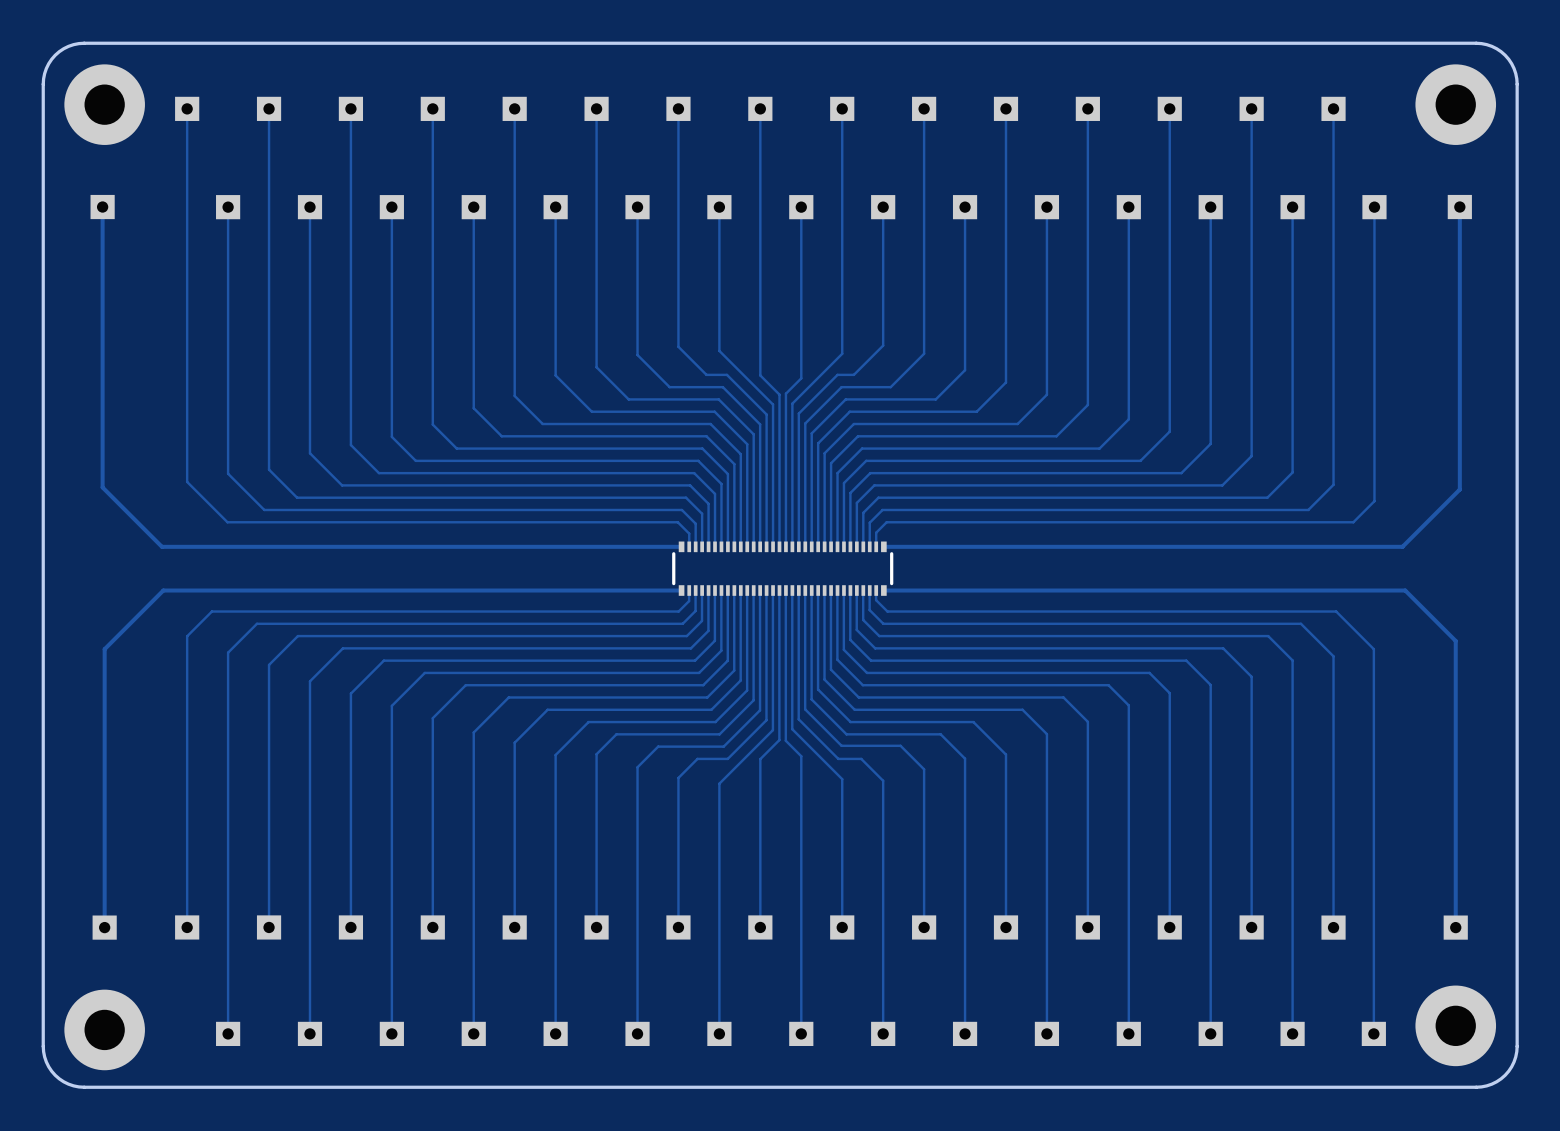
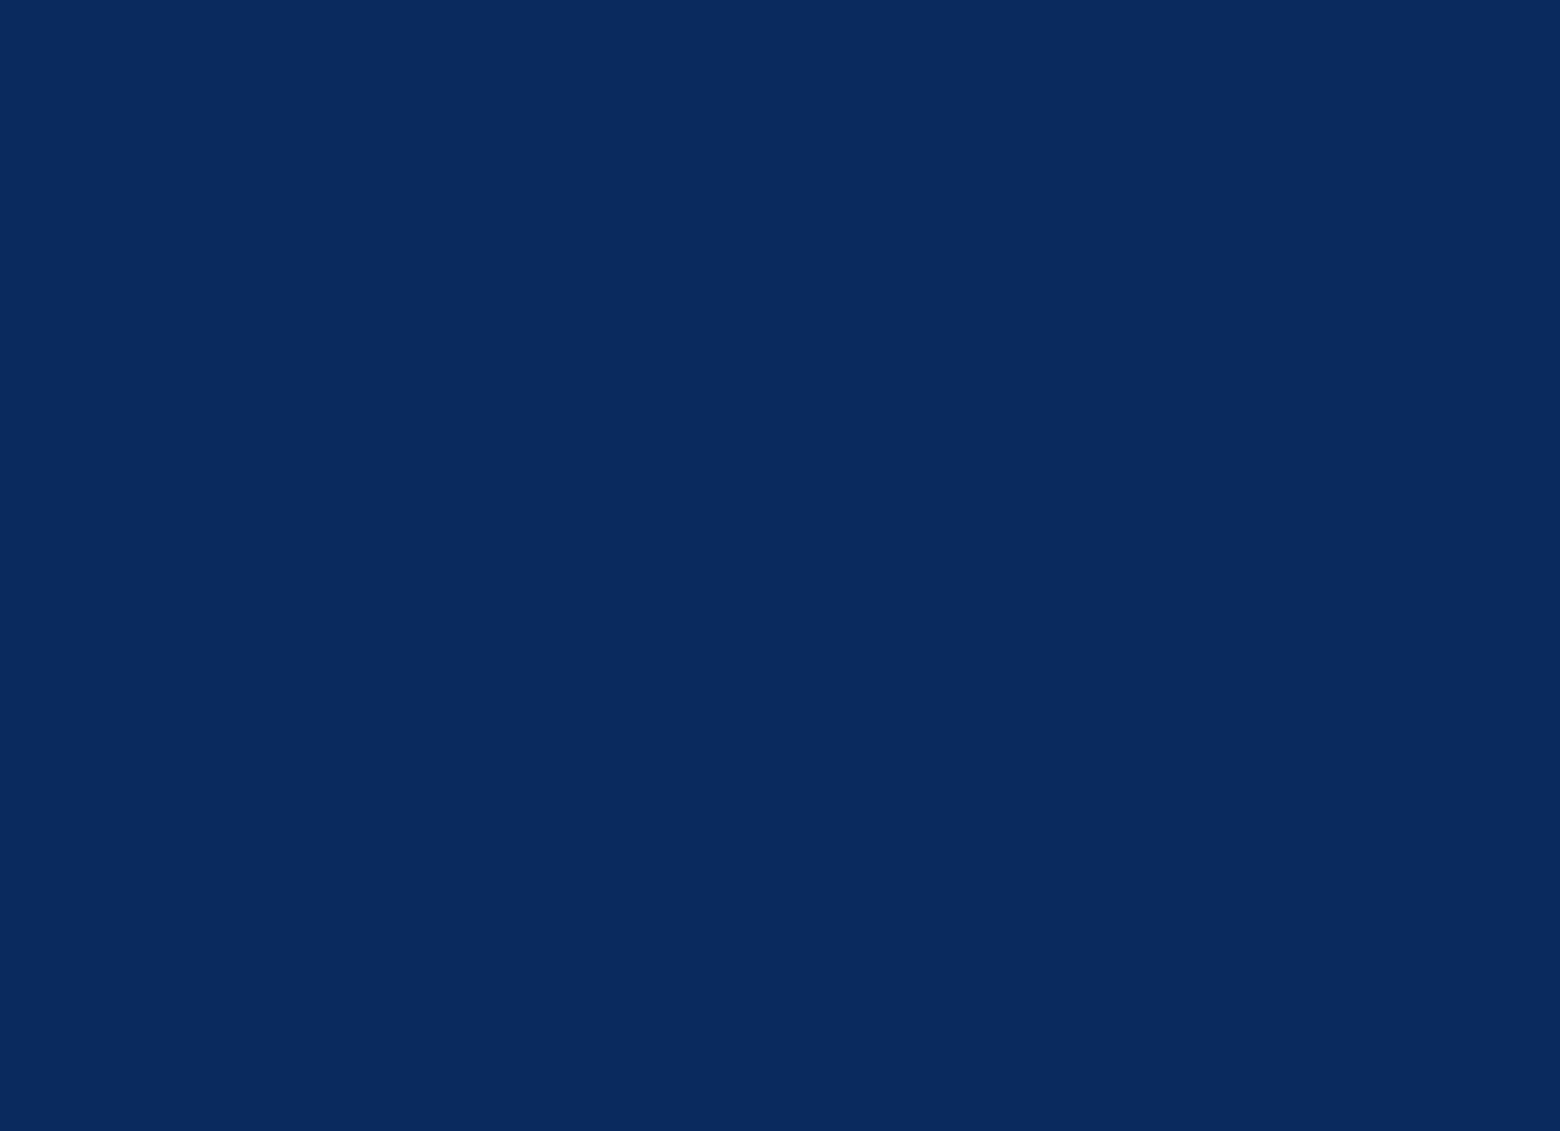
board edge: (1476, 43) (84, 43) (68, 46) (59, 51) (48, 63) (43, 84) (43, 1046) (44, 1056) (51, 1071) (63, 1081) (84, 1087) (1476, 1087) (1486, 1085) (1501, 1078) (1511, 1066) (1517, 1046) (1517, 84) (1514, 68) (1505, 55) (1491, 46) (1476, 43) -> none
part: (104, 104) -> none
part: (1455, 104) -> none
track: (187, 108) (187, 481) (227, 522) (677, 522) (689, 533) (689, 546) -> none
part: (187, 108) -> none
track: (269, 108) (269, 469) (297, 497) (686, 497) (702, 513) (702, 546) -> none
part: (269, 108) -> none
track: (350, 108) (350, 445) (378, 473) (694, 473) (715, 493) (715, 546) -> none
part: (350, 108) -> none
track: (432, 108) (432, 424) (456, 448) (702, 448) (727, 474) (727, 546) -> none
part: (432, 108) -> none
track: (514, 108) (514, 395) (542, 424) (710, 424) (740, 454) (740, 546) -> none
part: (514, 108) -> none
track: (596, 108) (596, 367) (628, 399) (718, 399) (753, 434) (753, 546) -> none
part: (596, 108) -> none
track: (678, 108) (678, 346) (706, 374) (726, 374) (766, 414) (766, 546) -> none
part: (678, 108) -> none
track: (760, 108) (760, 375) (779, 394) (779, 546) -> none
part: (760, 108) -> none
track: (842, 108) (842, 353) (792, 403) (792, 546) -> none
part: (842, 108) -> none
track: (924, 108) (924, 353) (890, 387) (841, 387) (805, 423) (805, 546) -> none
part: (924, 108) -> none
track: (1005, 108) (1005, 382) (976, 411) (849, 411) (818, 443) (818, 546) -> none
part: (1005, 108) -> none
track: (1087, 108) (1087, 404) (1056, 436) (857, 436) (831, 463) (831, 546) -> none
part: (1087, 108) -> none
track: (1169, 108) (1169, 431) (1140, 460) (866, 460) (843, 483) (843, 546) -> none
part: (1169, 108) -> none
track: (1251, 108) (1251, 456) (1222, 485) (874, 485) (856, 502) (856, 546) -> none
part: (1251, 108) -> none
track: (1333, 108) (1333, 484) (1308, 509) (882, 509) (869, 522) (869, 546) -> none
part: (1333, 108) -> none
track: (102, 207) (102, 487) (161, 546) (681, 546) -> none
part: (102, 207) -> none
track: (228, 207) (228, 473) (264, 509) (681, 509) (695, 523) (695, 546) -> none
part: (228, 207) -> none
track: (309, 207) (309, 453) (342, 485) (690, 485) (708, 503) (708, 546) -> none
part: (309, 207) -> none
track: (391, 207) (391, 436) (415, 460) (698, 460) (721, 484) (721, 546) -> none
part: (391, 207) -> none
track: (473, 207) (473, 408) (501, 436) (706, 436) (734, 464) (734, 546) -> none
part: (473, 207) -> none
track: (555, 207) (555, 375) (591, 411) (714, 411) (747, 444) (747, 546) -> none
part: (555, 207) -> none
track: (637, 207) (637, 355) (669, 387) (722, 387) (760, 424) (760, 546) -> none
part: (637, 207) -> none
track: (719, 207) (719, 350) (773, 404) (773, 546) -> none
part: (719, 207) -> none
track: (801, 207) (801, 378) (785, 393) (785, 546) -> none
part: (801, 207) -> none
track: (883, 207) (883, 345) (853, 374) (837, 374) (798, 413) (798, 546) -> none
part: (883, 207) -> none
track: (965, 207) (965, 370) (935, 399) (845, 399) (811, 433) (811, 546) -> none
part: (965, 207) -> none
track: (1046, 207) (1046, 394) (1017, 424) (853, 424) (824, 453) (824, 546) -> none
part: (1046, 207) -> none
track: (1128, 207) (1128, 419) (1099, 448) (862, 448) (837, 473) (837, 546) -> none
part: (1128, 207) -> none
track: (1210, 207) (1210, 443) (1181, 473) (870, 473) (850, 493) (850, 546) -> none
part: (1210, 207) -> none
track: (1292, 207) (1292, 472) (1267, 497) (878, 497) (863, 512) (863, 546) -> none
part: (1292, 207) -> none
track: (1374, 207) (1374, 501) (1353, 522) (886, 522) (876, 532) (876, 546) -> none
part: (1374, 207) -> none
track: (1459, 207) (1459, 489) (1402, 546) (883, 546) -> none
part: (1459, 207) -> none
part: (782, 568) -> none
track: (689, 586) (689, 601) (678, 611) (211, 611) (187, 636) (187, 927) -> none
track: (695, 586) (695, 611) (682, 623) (256, 623) (228, 652) (228, 1033) -> none
track: (702, 586) (702, 620) (686, 636) (297, 636) (269, 664) (269, 927) -> none
track: (708, 586) (708, 630) (690, 648) (342, 648) (309, 681) (309, 1033) -> none
track: (714, 586) (714, 640) (695, 660) (383, 660) (350, 693) (350, 927) -> none
track: (721, 586) (721, 650) (699, 672) (424, 672) (391, 705) (391, 1033) -> none
track: (727, 586) (727, 660) (703, 685) (465, 685) (432, 718) (432, 927) -> none
track: (734, 586) (734, 670) (707, 697) (508, 697) (473, 732) (473, 1033) -> none
track: (740, 586) (740, 680) (711, 709) (547, 709) (514, 742) (514, 927) -> none
track: (747, 586) (747, 690) (715, 722) (588, 722) (555, 755) (555, 1033) -> none
track: (753, 586) (753, 700) (719, 734) (616, 734) (596, 754) (596, 927) -> none
track: (760, 586) (760, 710) (723, 746) (658, 746) (637, 767) (637, 1033) -> none
track: (766, 586) (766, 720) (727, 758) (697, 758) (678, 777) (678, 927) -> none
track: (772, 586) (772, 730) (719, 783) (719, 1033) -> none
track: (779, 586) (779, 740) (760, 759) (760, 927) -> none
track: (785, 586) (785, 740) (801, 756) (801, 1033) -> none
track: (792, 586) (792, 729) (842, 779) (842, 927) -> none
track: (798, 586) (798, 719) (838, 758) (861, 758) (883, 780) (883, 1033) -> none
track: (805, 586) (805, 709) (841, 745) (900, 745) (924, 769) (924, 927) -> none
track: (811, 586) (811, 699) (846, 734) (940, 734) (965, 758) (965, 1033) -> none
track: (818, 586) (818, 689) (850, 722) (973, 722) (1005, 754) (1005, 927) -> none
track: (824, 586) (824, 679) (854, 709) (1022, 709) (1046, 734) (1046, 1033) -> none
track: (830, 586) (830, 669) (858, 697) (1063, 697) (1087, 721) (1087, 927) -> none
track: (837, 586) (837, 659) (862, 685) (1108, 685) (1128, 705) (1128, 1033) -> none
track: (843, 586) (843, 649) (867, 672) (1149, 672) (1169, 693) (1169, 927) -> none
track: (850, 586) (850, 639) (871, 660) (1186, 660) (1210, 685) (1210, 1033) -> none
track: (856, 586) (856, 629) (875, 648) (1223, 648) (1251, 676) (1251, 927) -> none
track: (863, 586) (863, 620) (879, 636) (1268, 636) (1292, 660) (1292, 1033) -> none
track: (869, 586) (869, 610) (883, 623) (1300, 623) (1333, 656) (1333, 927) -> none
track: (876, 586) (876, 600) (887, 611) (1336, 611) (1373, 649) (1373, 1030) -> none
track: (681, 590) (163, 590) (104, 649) (104, 927) -> none
track: (883, 590) (1405, 590) (1455, 641) (1455, 927) -> none
part: (104, 927) -> none
part: (187, 927) -> none
part: (269, 927) -> none
part: (350, 927) -> none
part: (432, 927) -> none
part: (514, 927) -> none
part: (596, 927) -> none
part: (678, 927) -> none
part: (760, 927) -> none
part: (842, 927) -> none
part: (924, 927) -> none
part: (1005, 927) -> none
part: (1087, 927) -> none
part: (1169, 927) -> none
part: (1251, 927) -> none
part: (1333, 927) -> none
part: (1455, 927) -> none
part: (1455, 1025) -> none
part: (104, 1029) -> none
part: (228, 1033) -> none
part: (309, 1033) -> none
part: (391, 1033) -> none
part: (473, 1033) -> none
part: (555, 1033) -> none
part: (637, 1033) -> none
part: (719, 1033) -> none
part: (801, 1033) -> none
part: (883, 1033) -> none
part: (965, 1033) -> none
part: (1046, 1033) -> none
part: (1128, 1033) -> none
part: (1210, 1033) -> none
part: (1292, 1033) -> none
part: (1373, 1033) -> none

